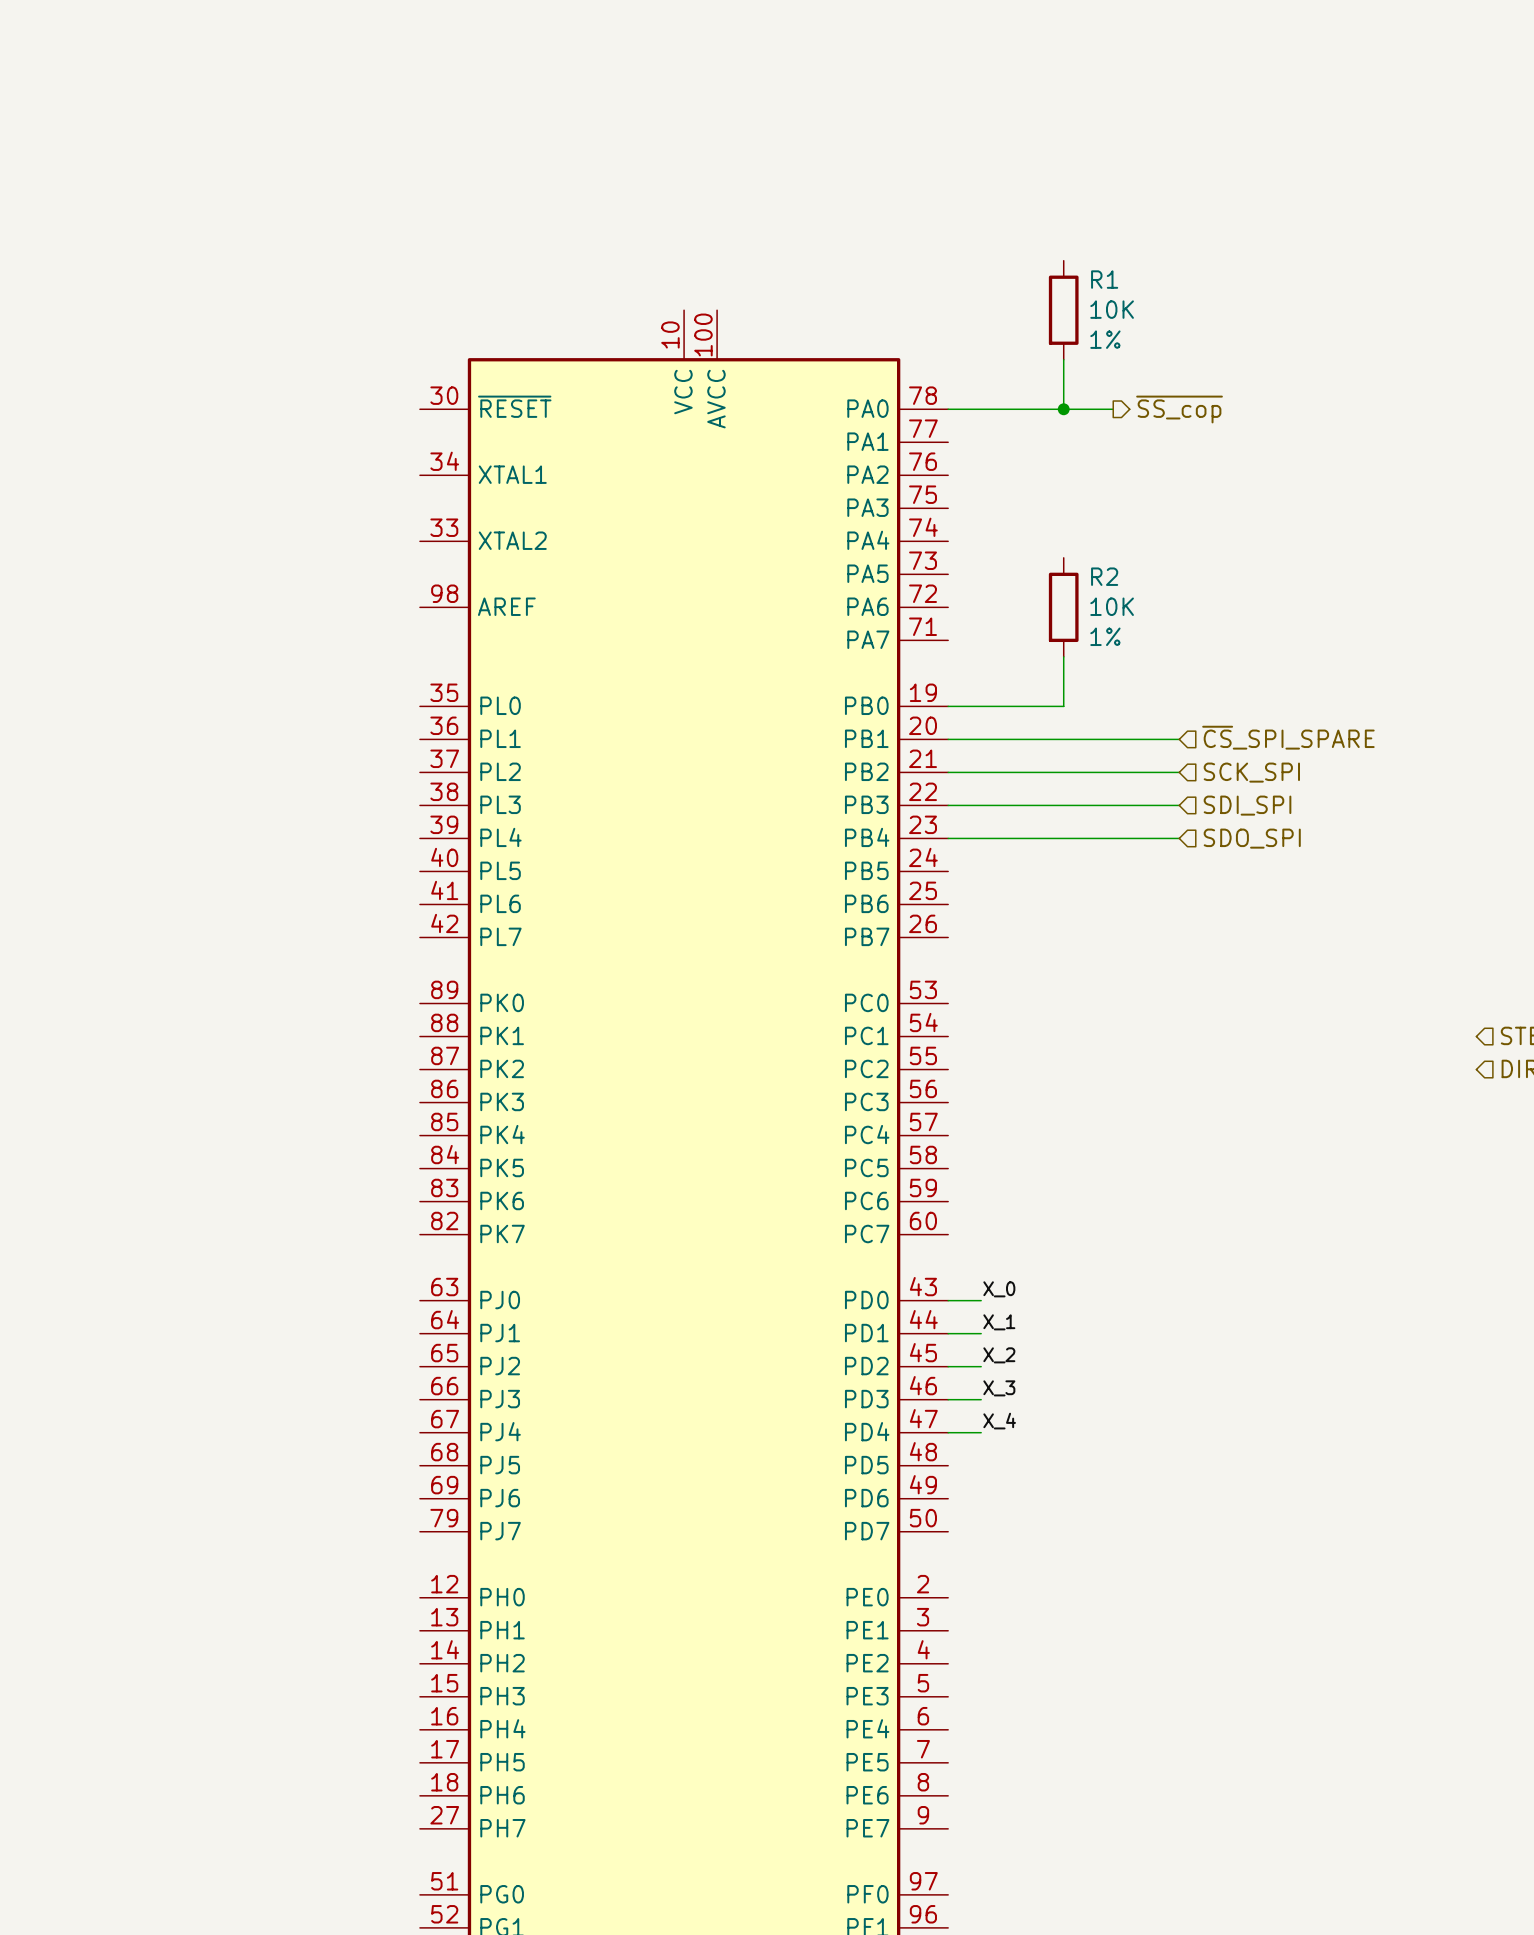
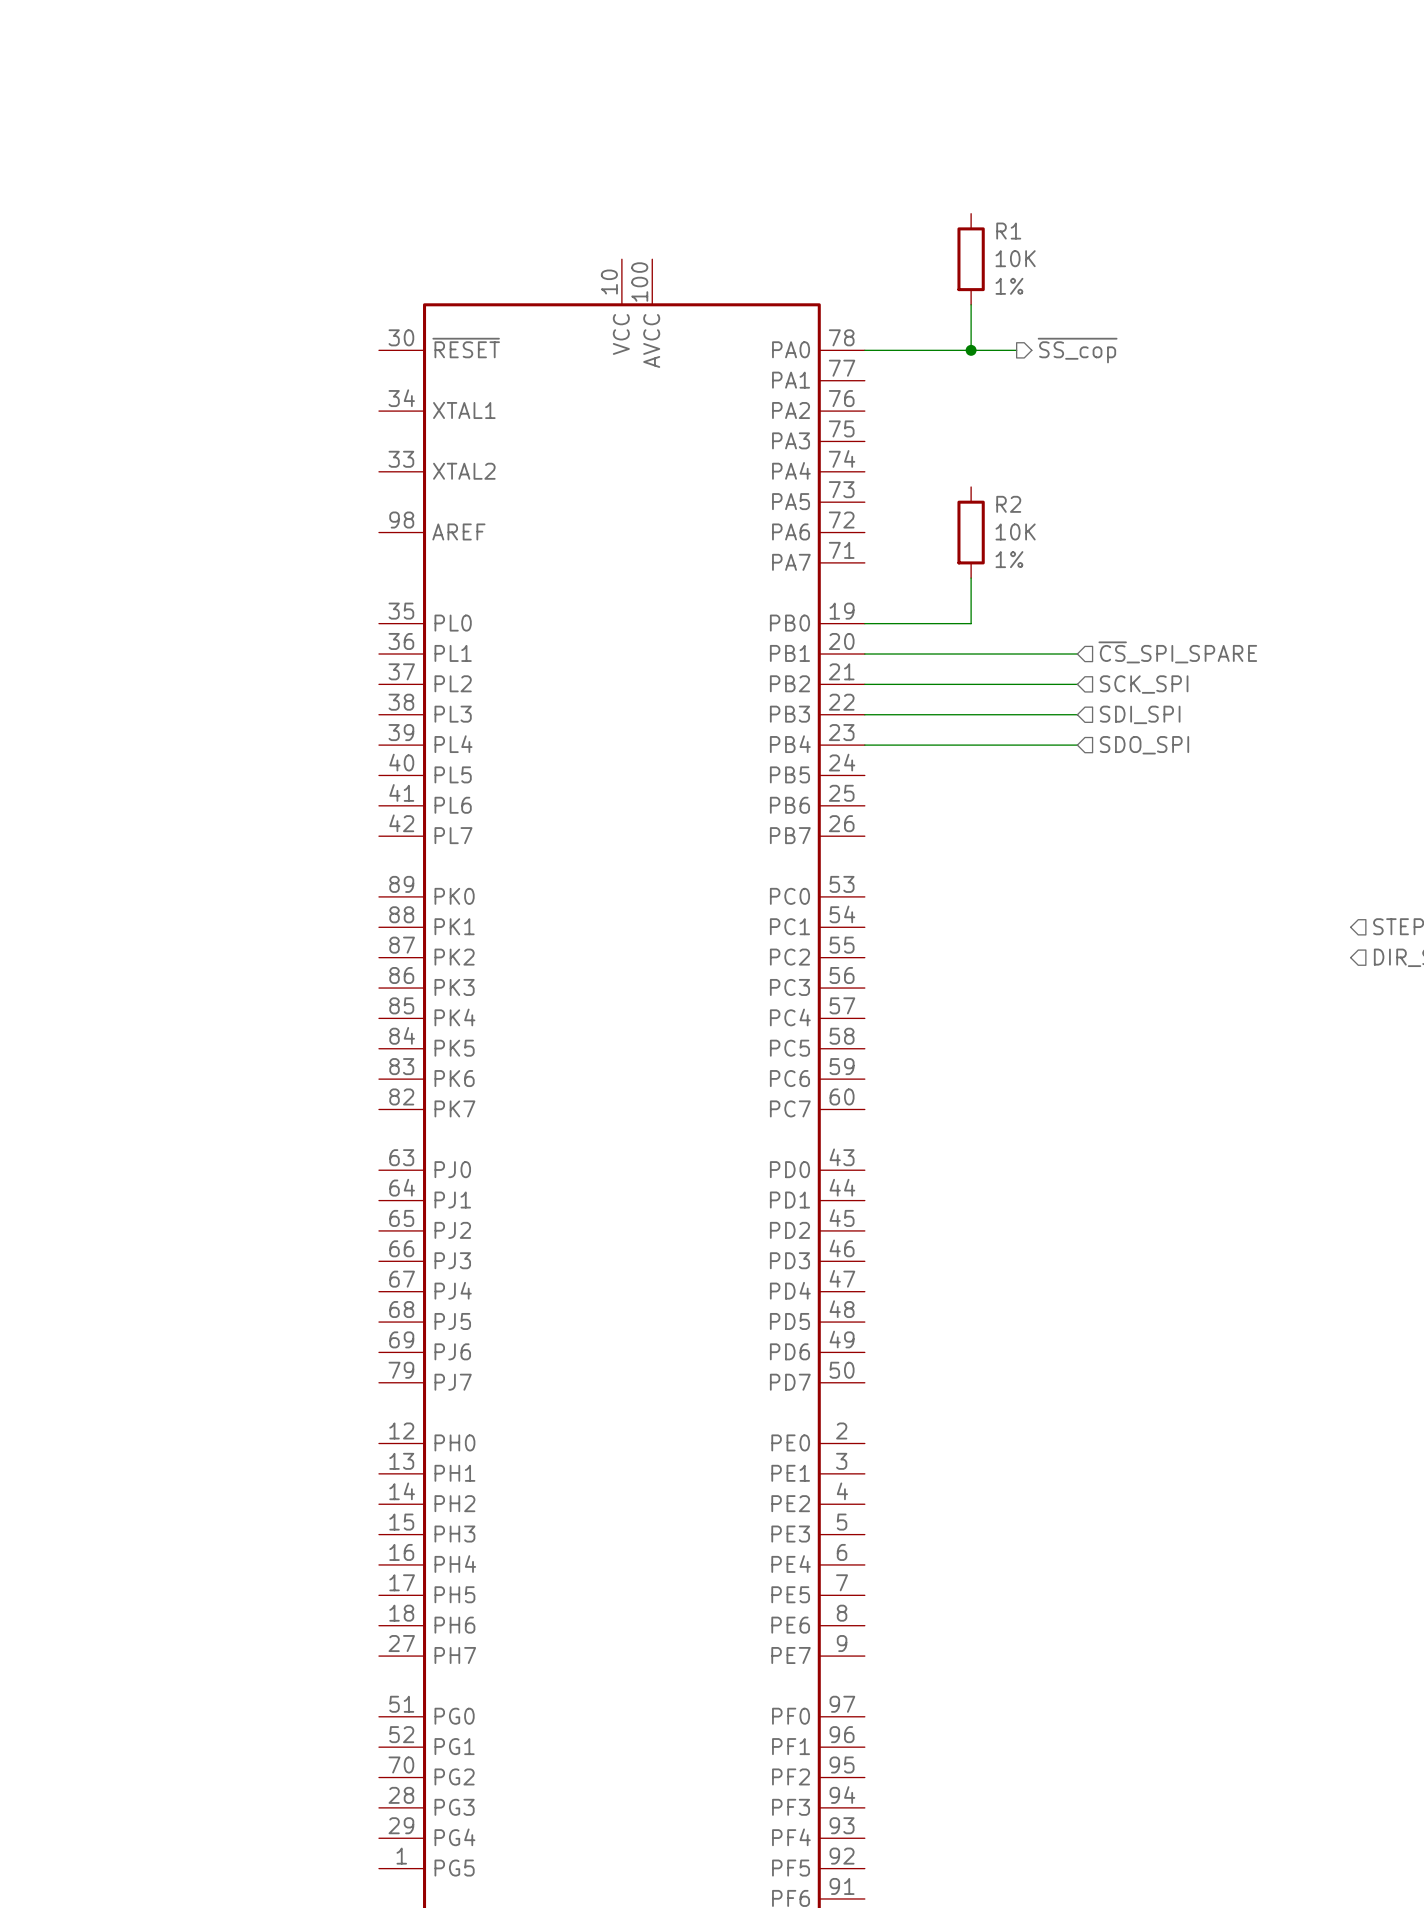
label: X_0 (999, 1289) -> none
wire: (948, 1300) (981, 1300) -> none
label: X_1 (999, 1322) -> none
wire: (948, 1333) (981, 1333) -> none
label: X_2 (999, 1355) -> none
wire: (948, 1366) (981, 1366) -> none
label: X_3 (999, 1388) -> none
wire: (948, 1399) (981, 1399) -> none
label: X_4 (999, 1421) -> none
wire: (948, 1432) (981, 1432) -> none

